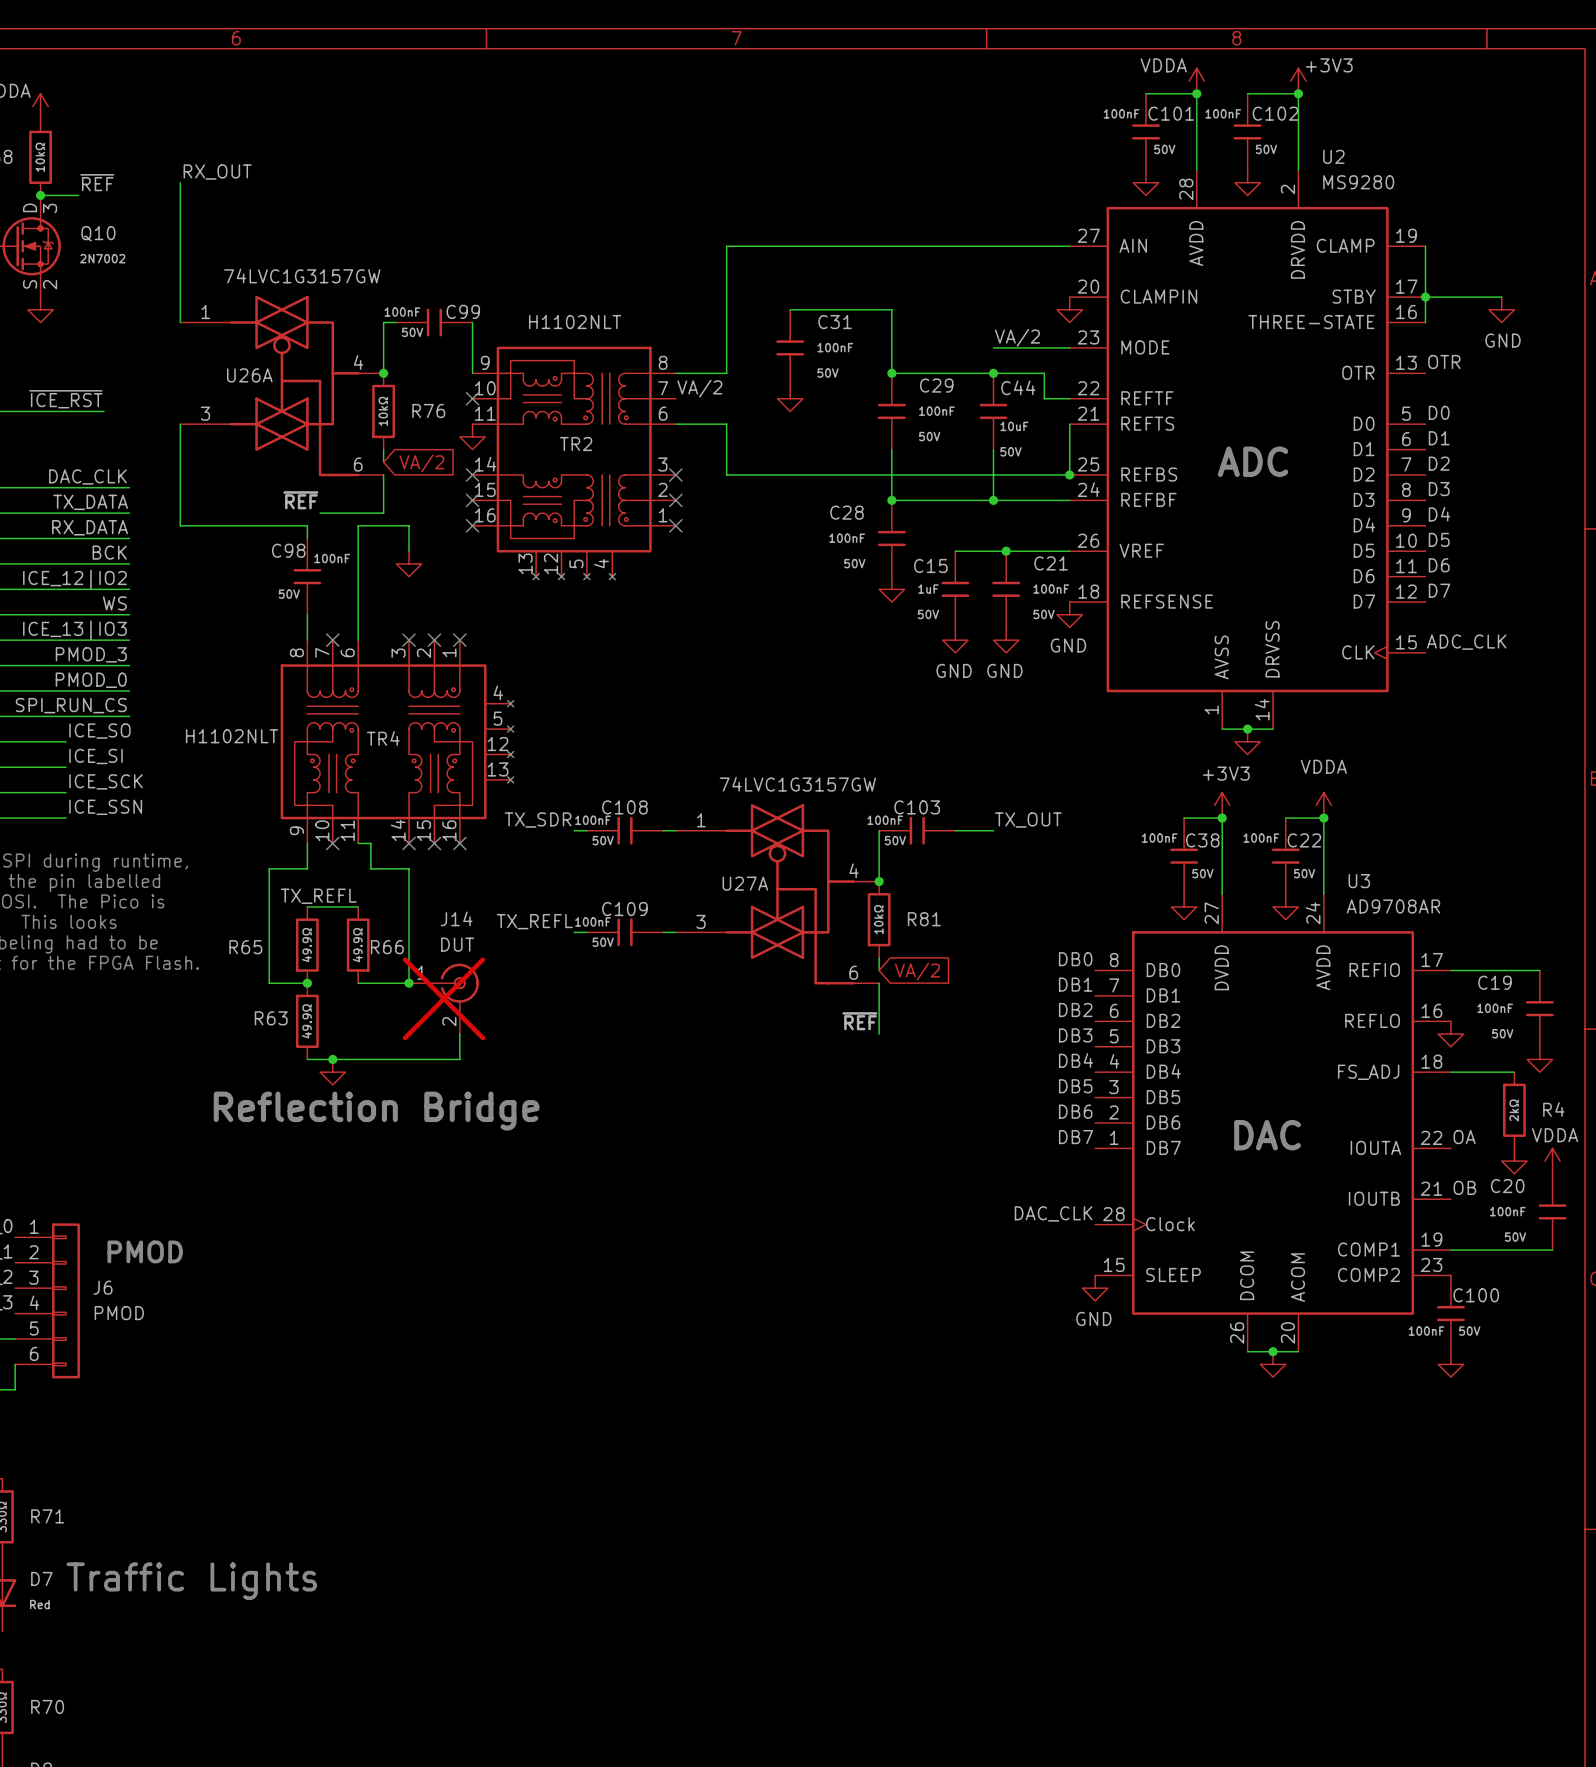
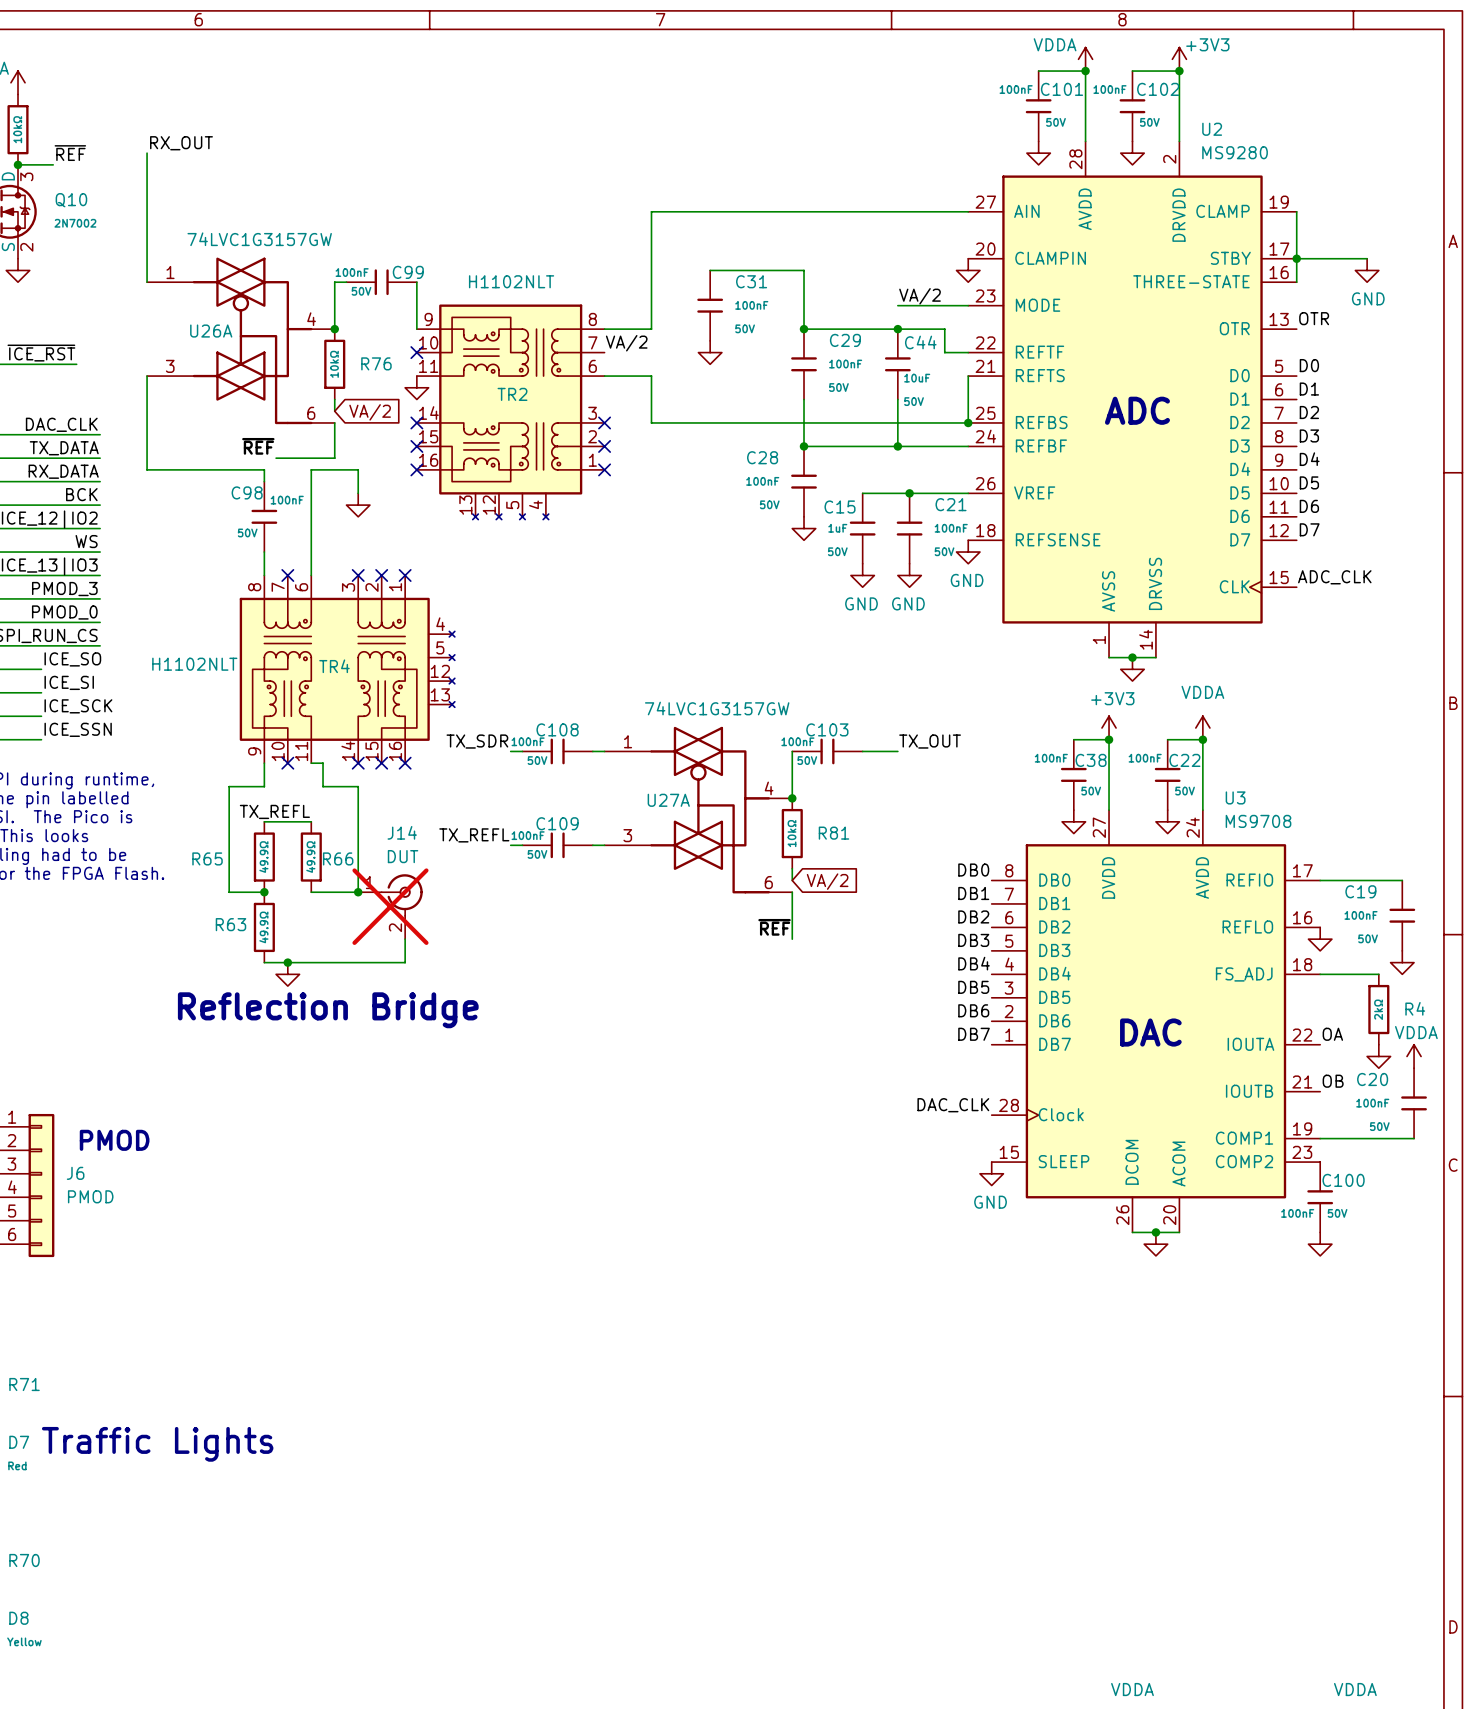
U3 value: AD9708AR (1393, 906) -> MS9708 (1258, 821)

